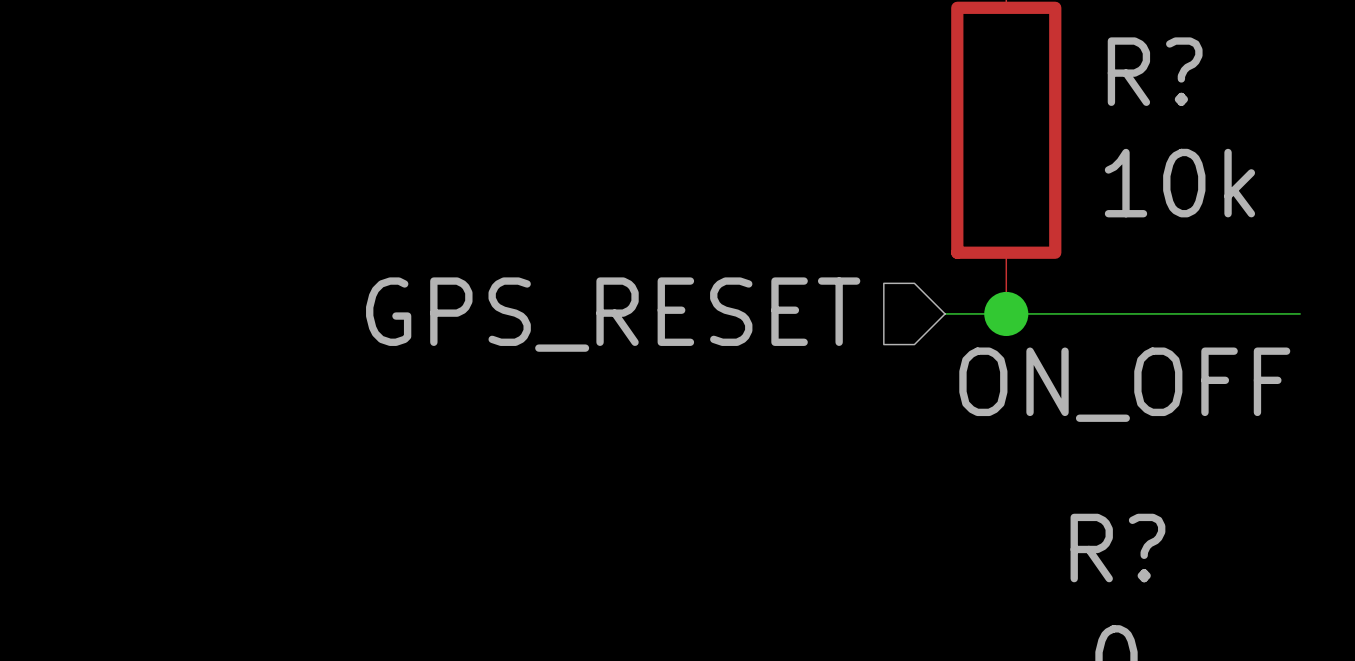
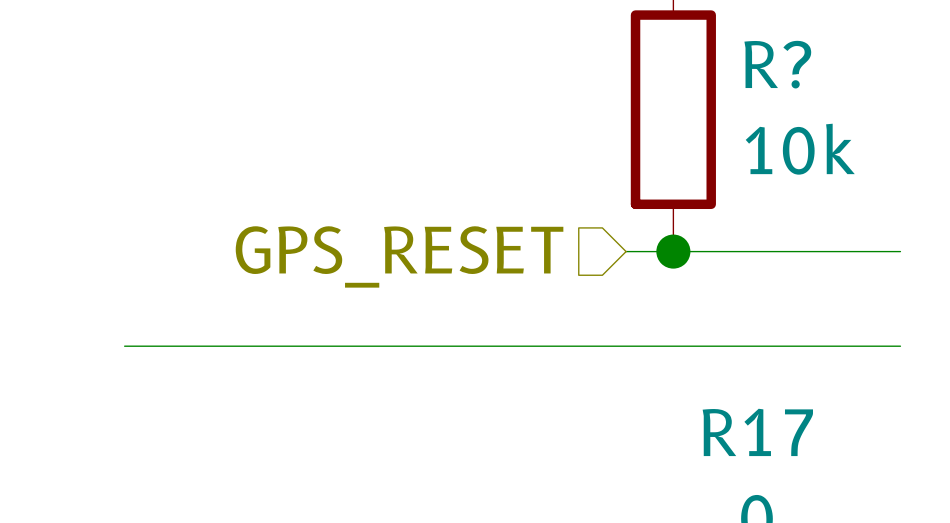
label: ON_OFF (1124, 384) -> none
wire: none -> (124, 346) (900, 346)
R? name: R? (1117, 548) -> R17 (757, 432)

